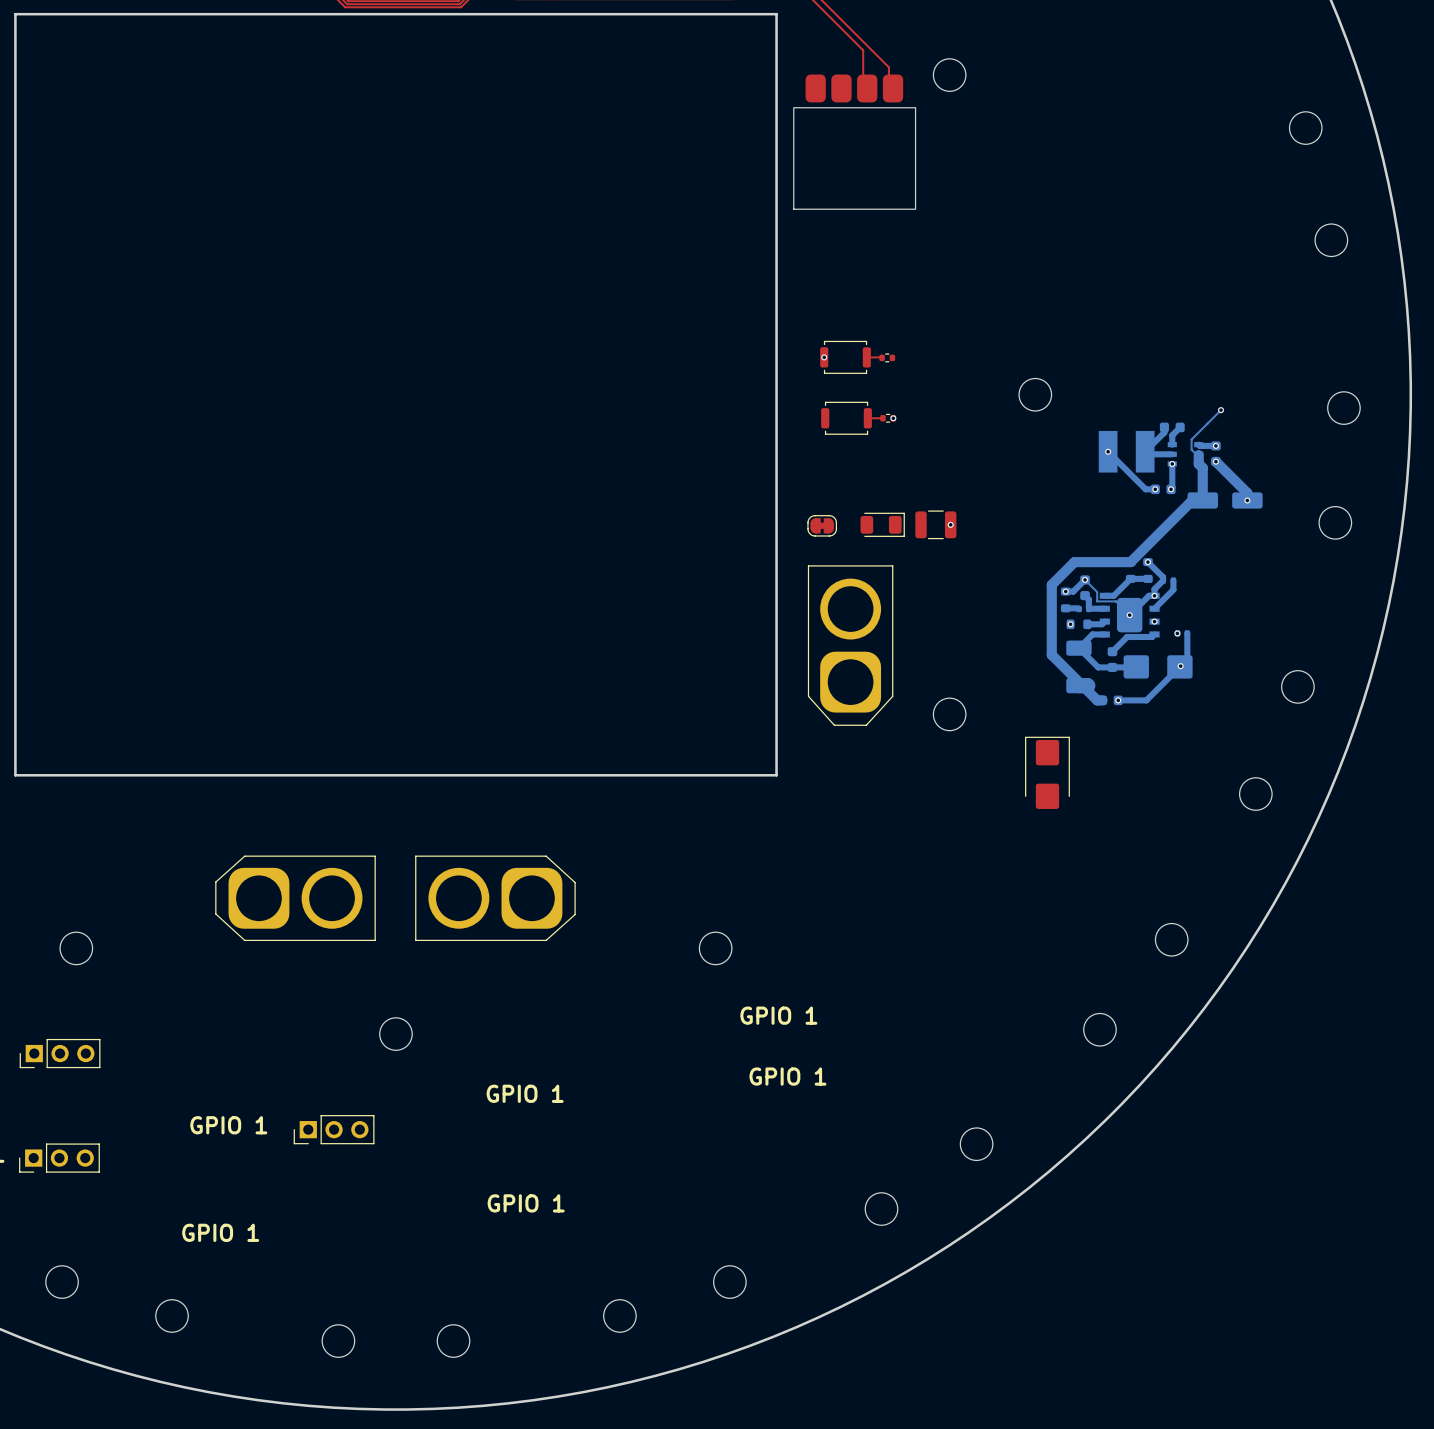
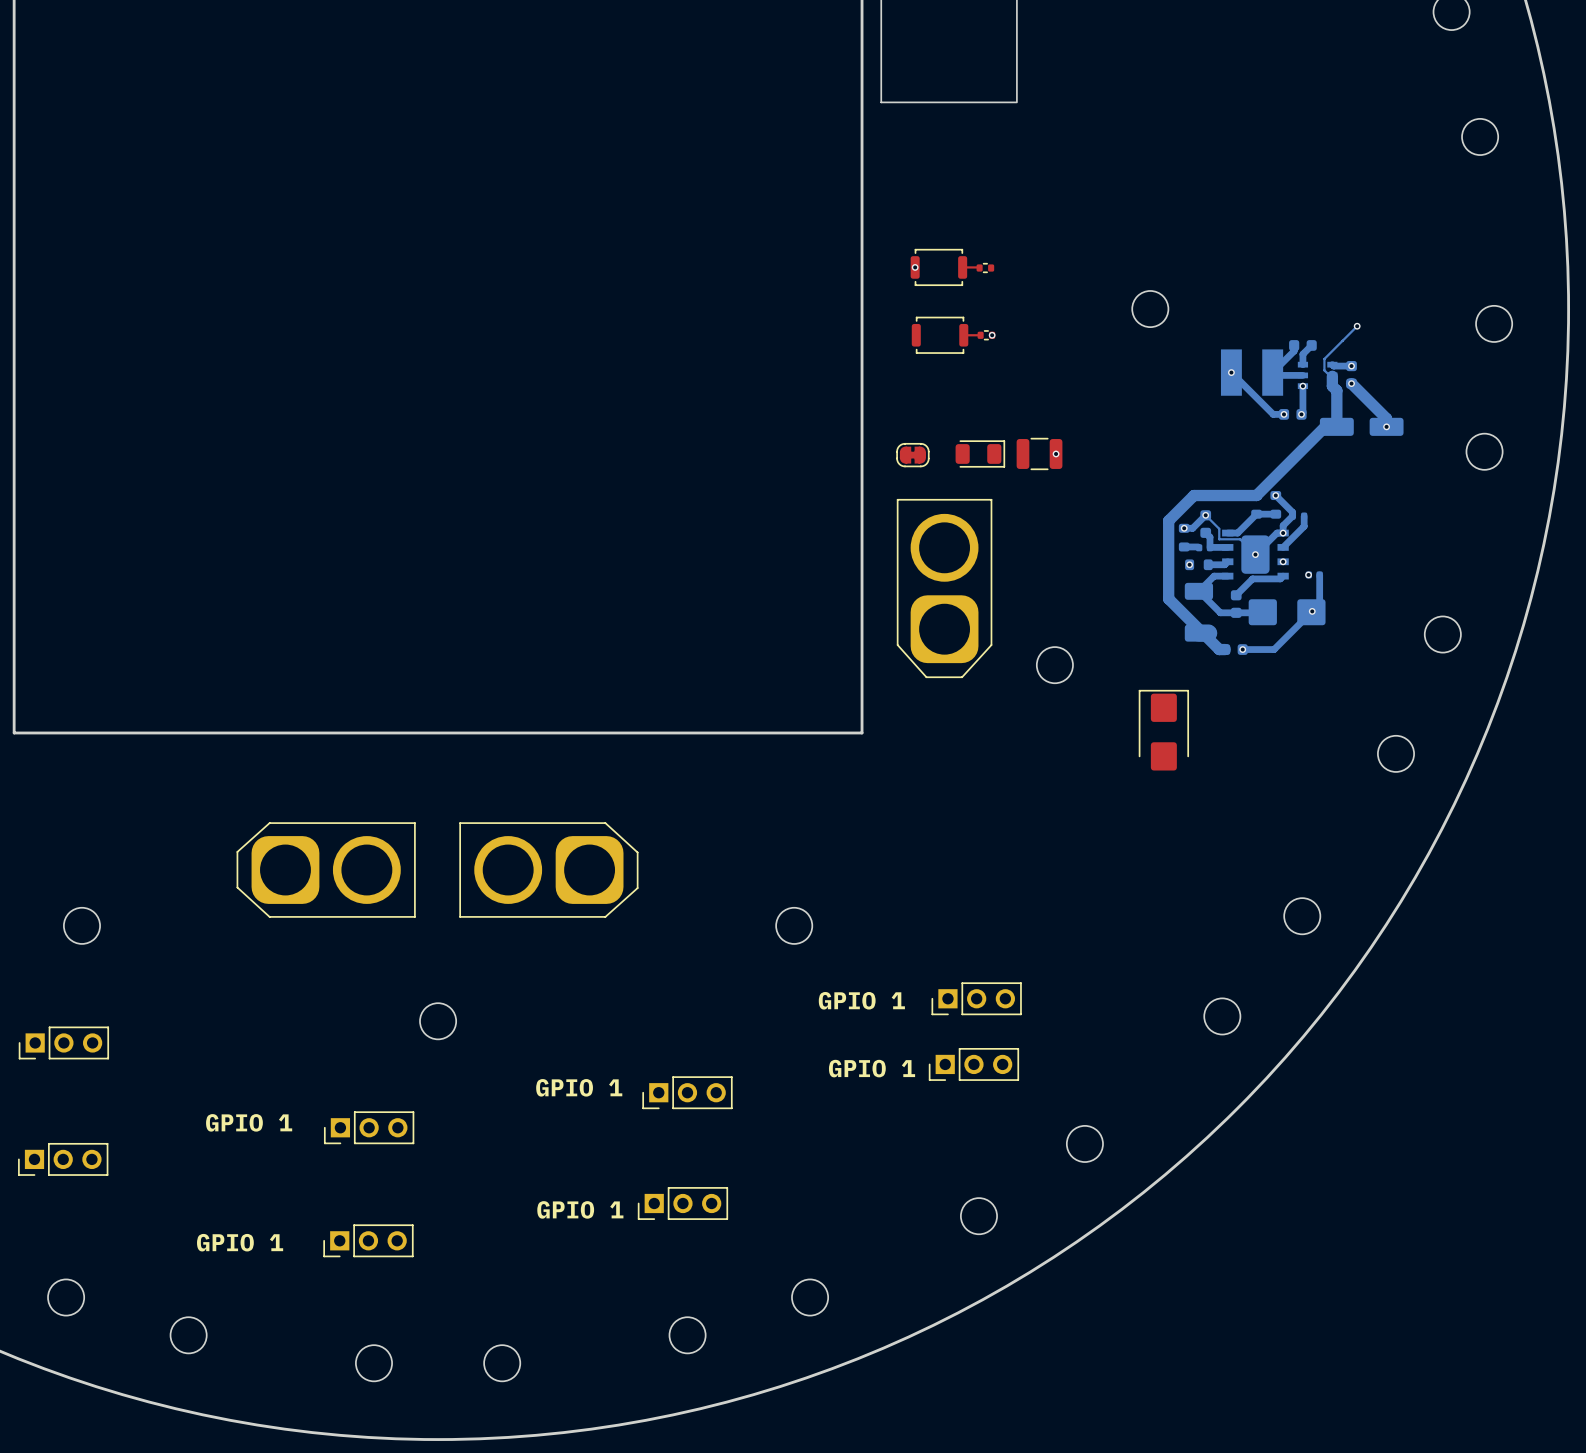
part: none -> (976, 998)
part: none -> (973, 1064)
part: none -> (687, 1092)
part: none -> (682, 1203)
part: none -> (368, 1240)

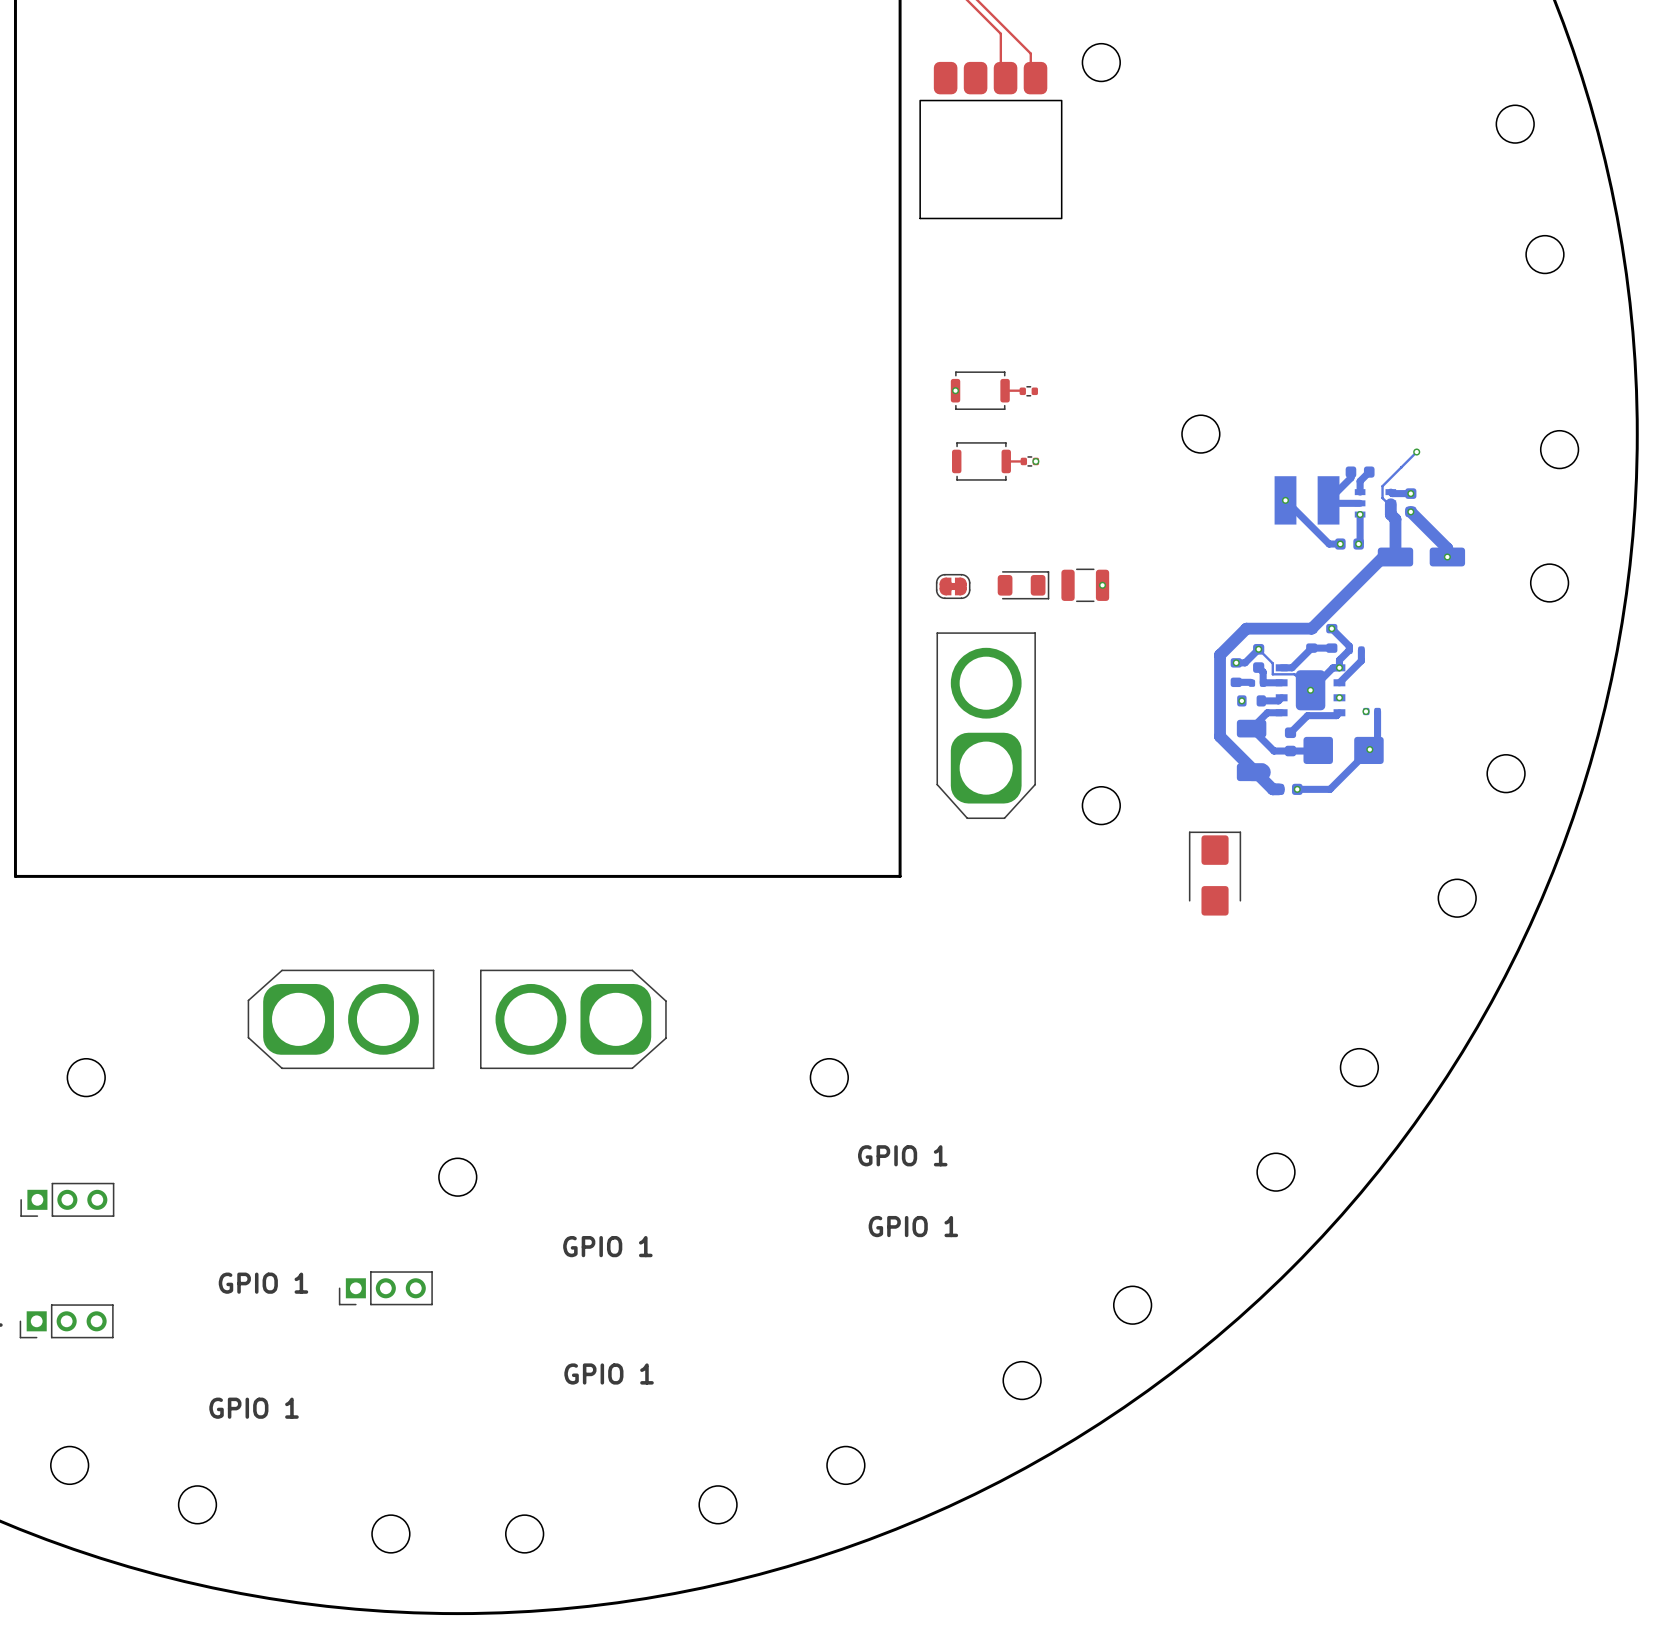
part: (976, 998) -> none
part: (973, 1064) -> none
part: (687, 1092) -> none
part: (682, 1203) -> none
part: (368, 1240) -> none

